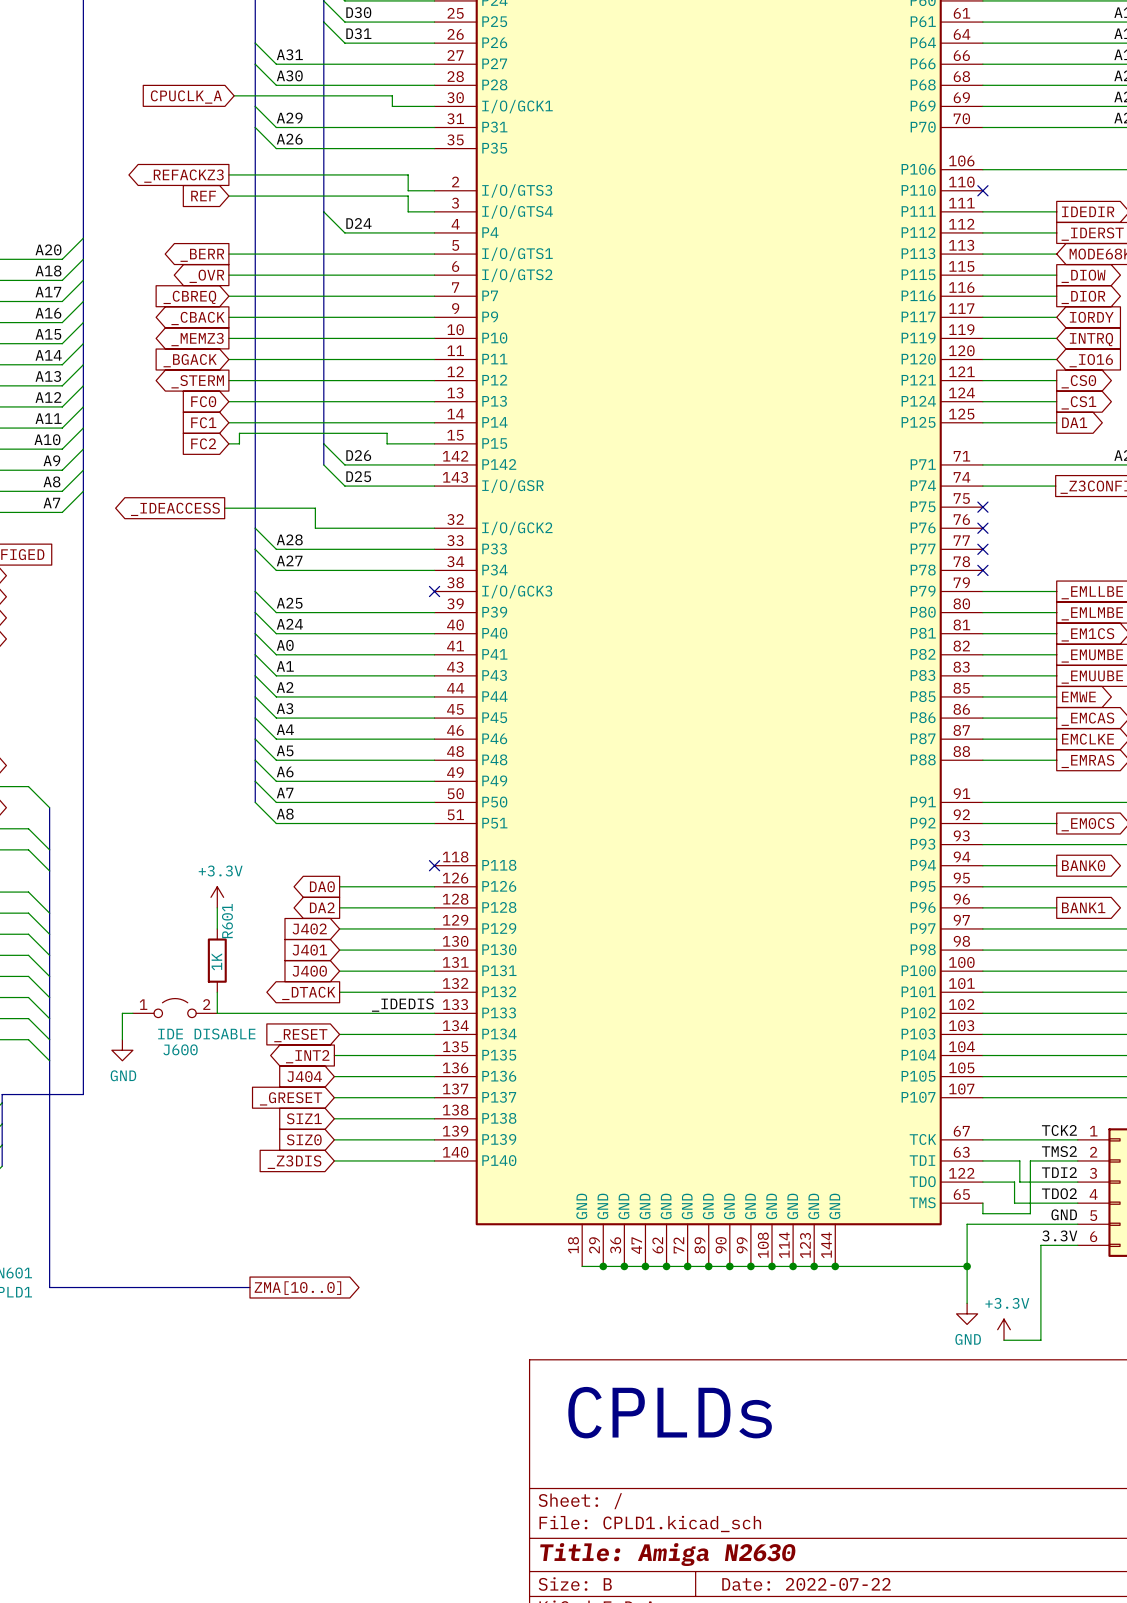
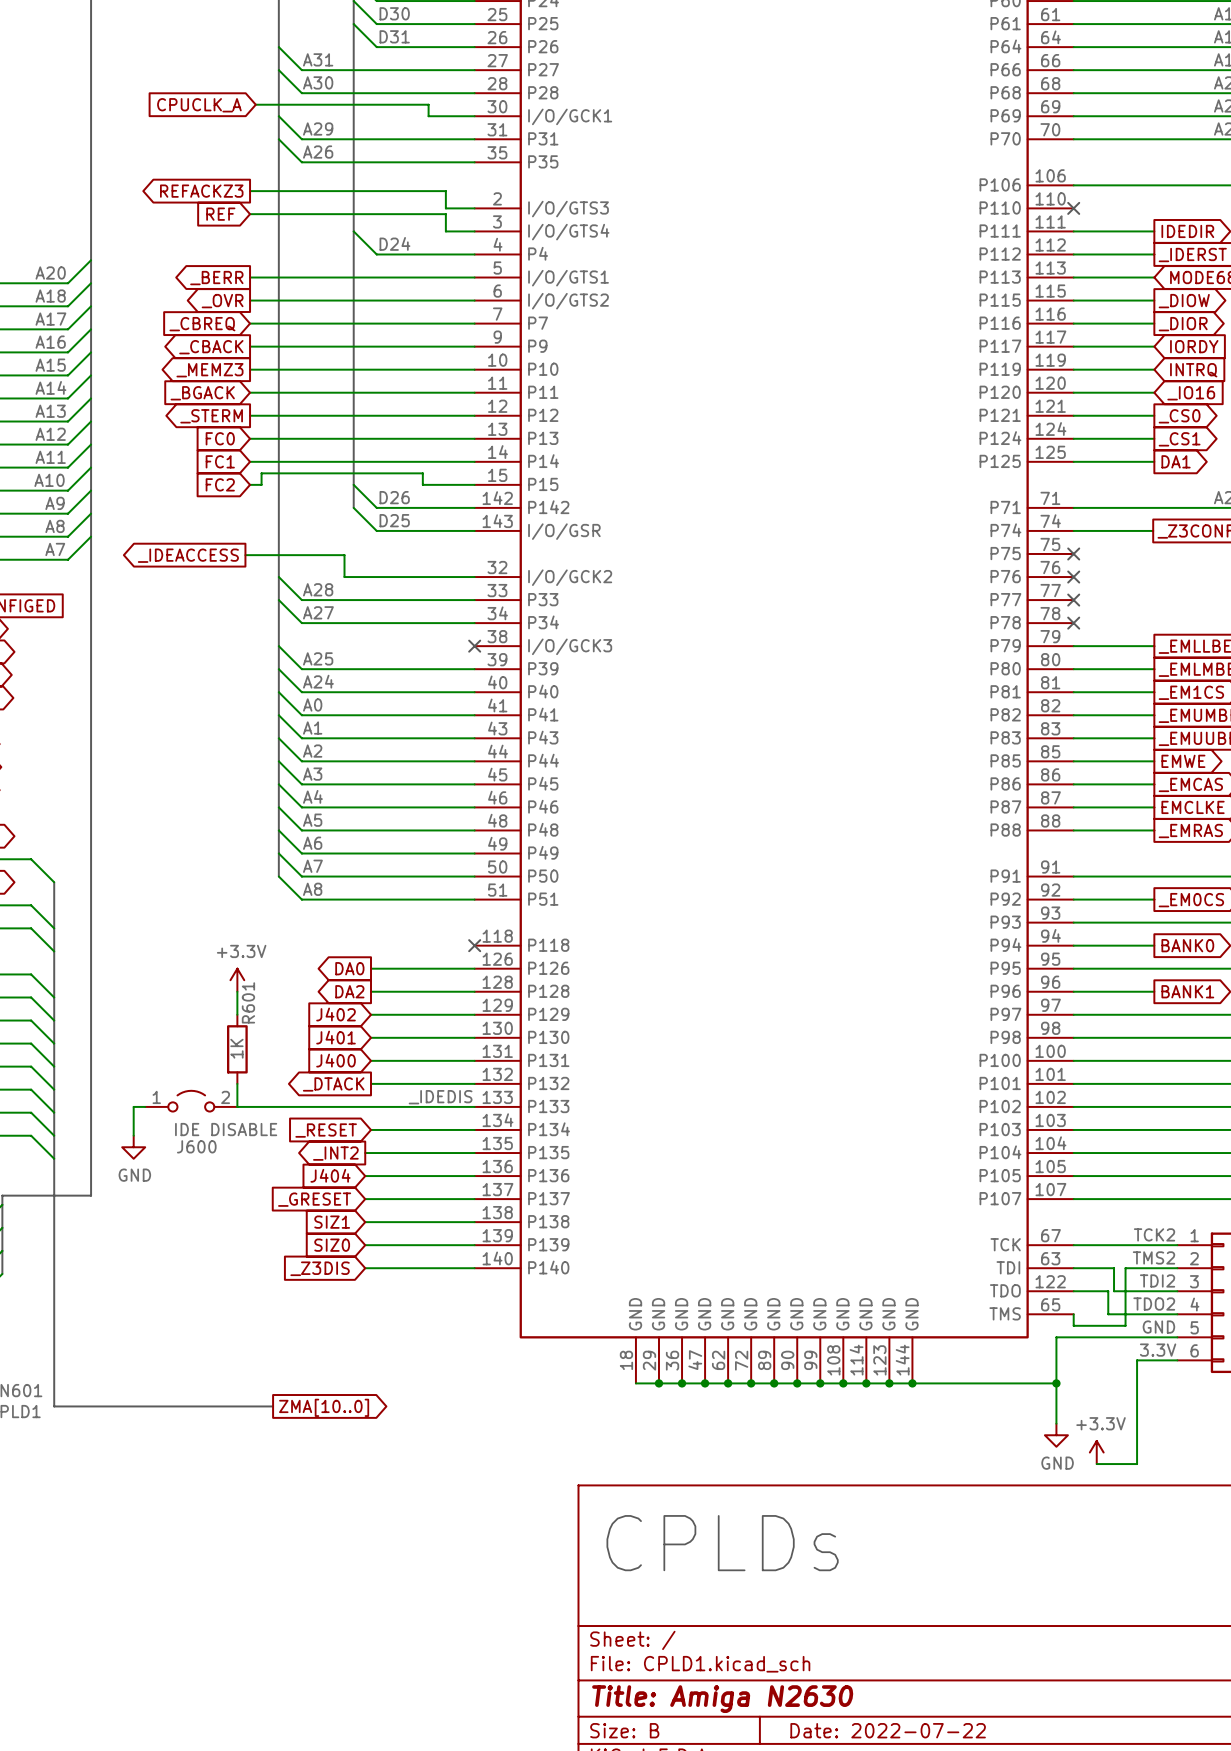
global label: _REFACKZ3 (183, 176) -> REFACKZ3 (201, 191)

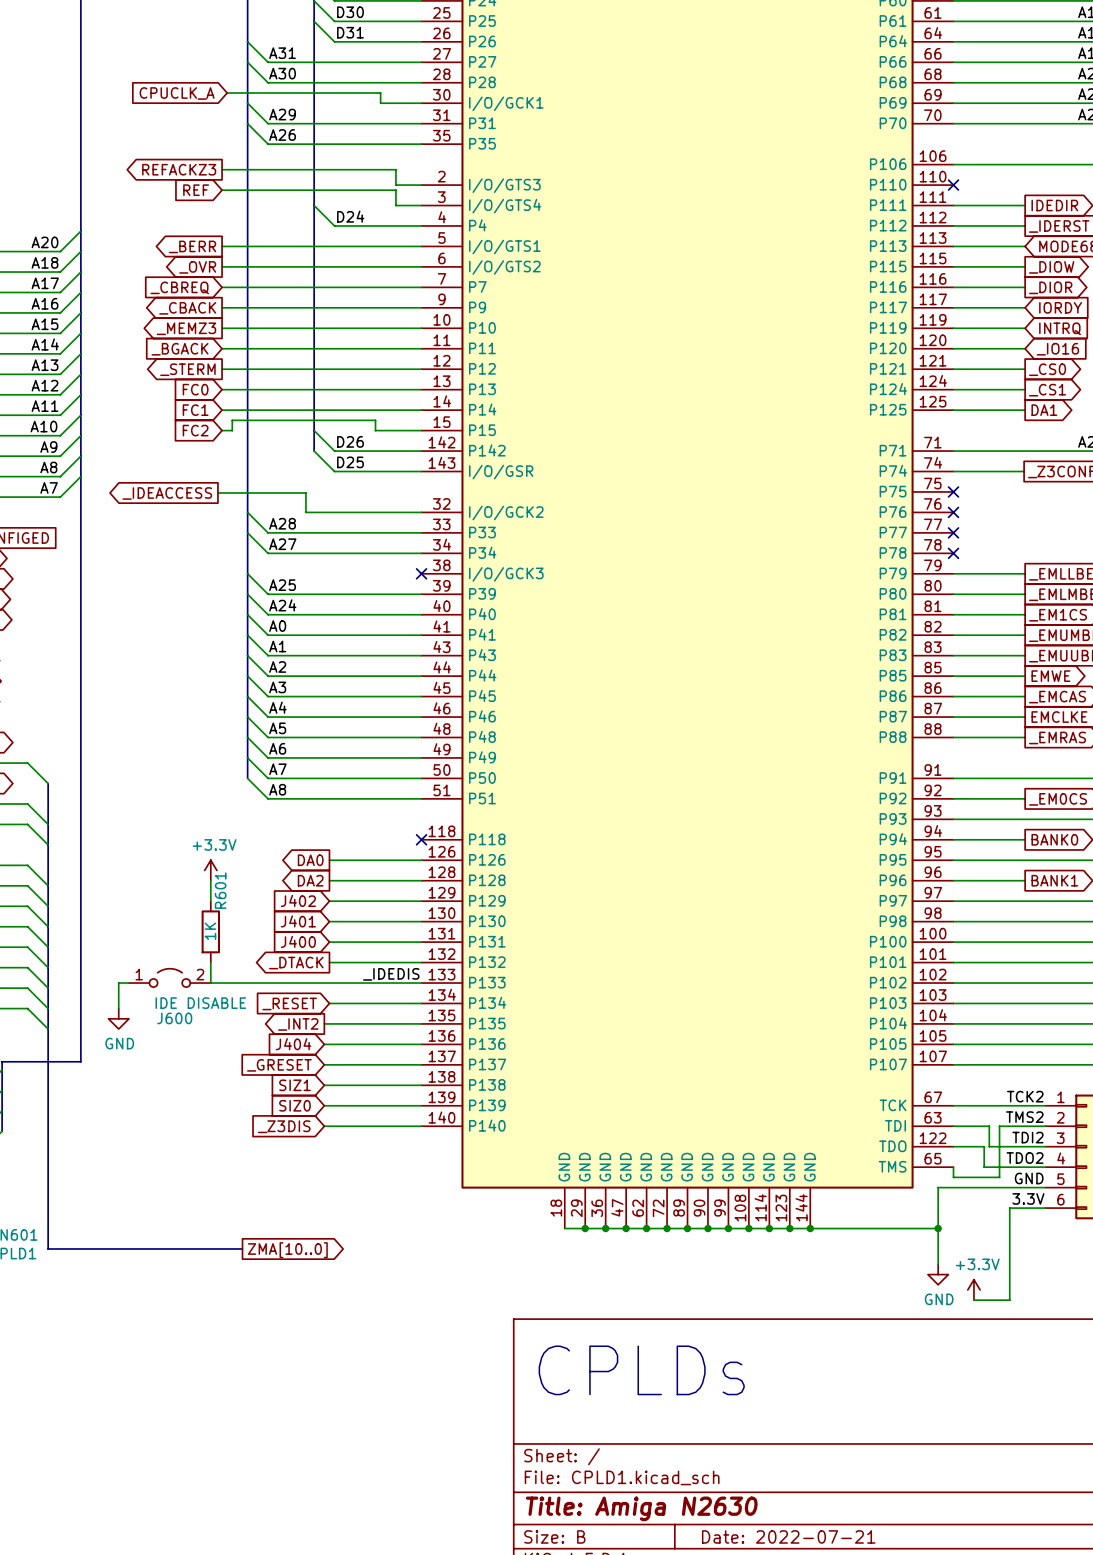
title block: Date: 2022-07-22 (888, 1730) -> Date: 2022-07-21 (788, 1536)

